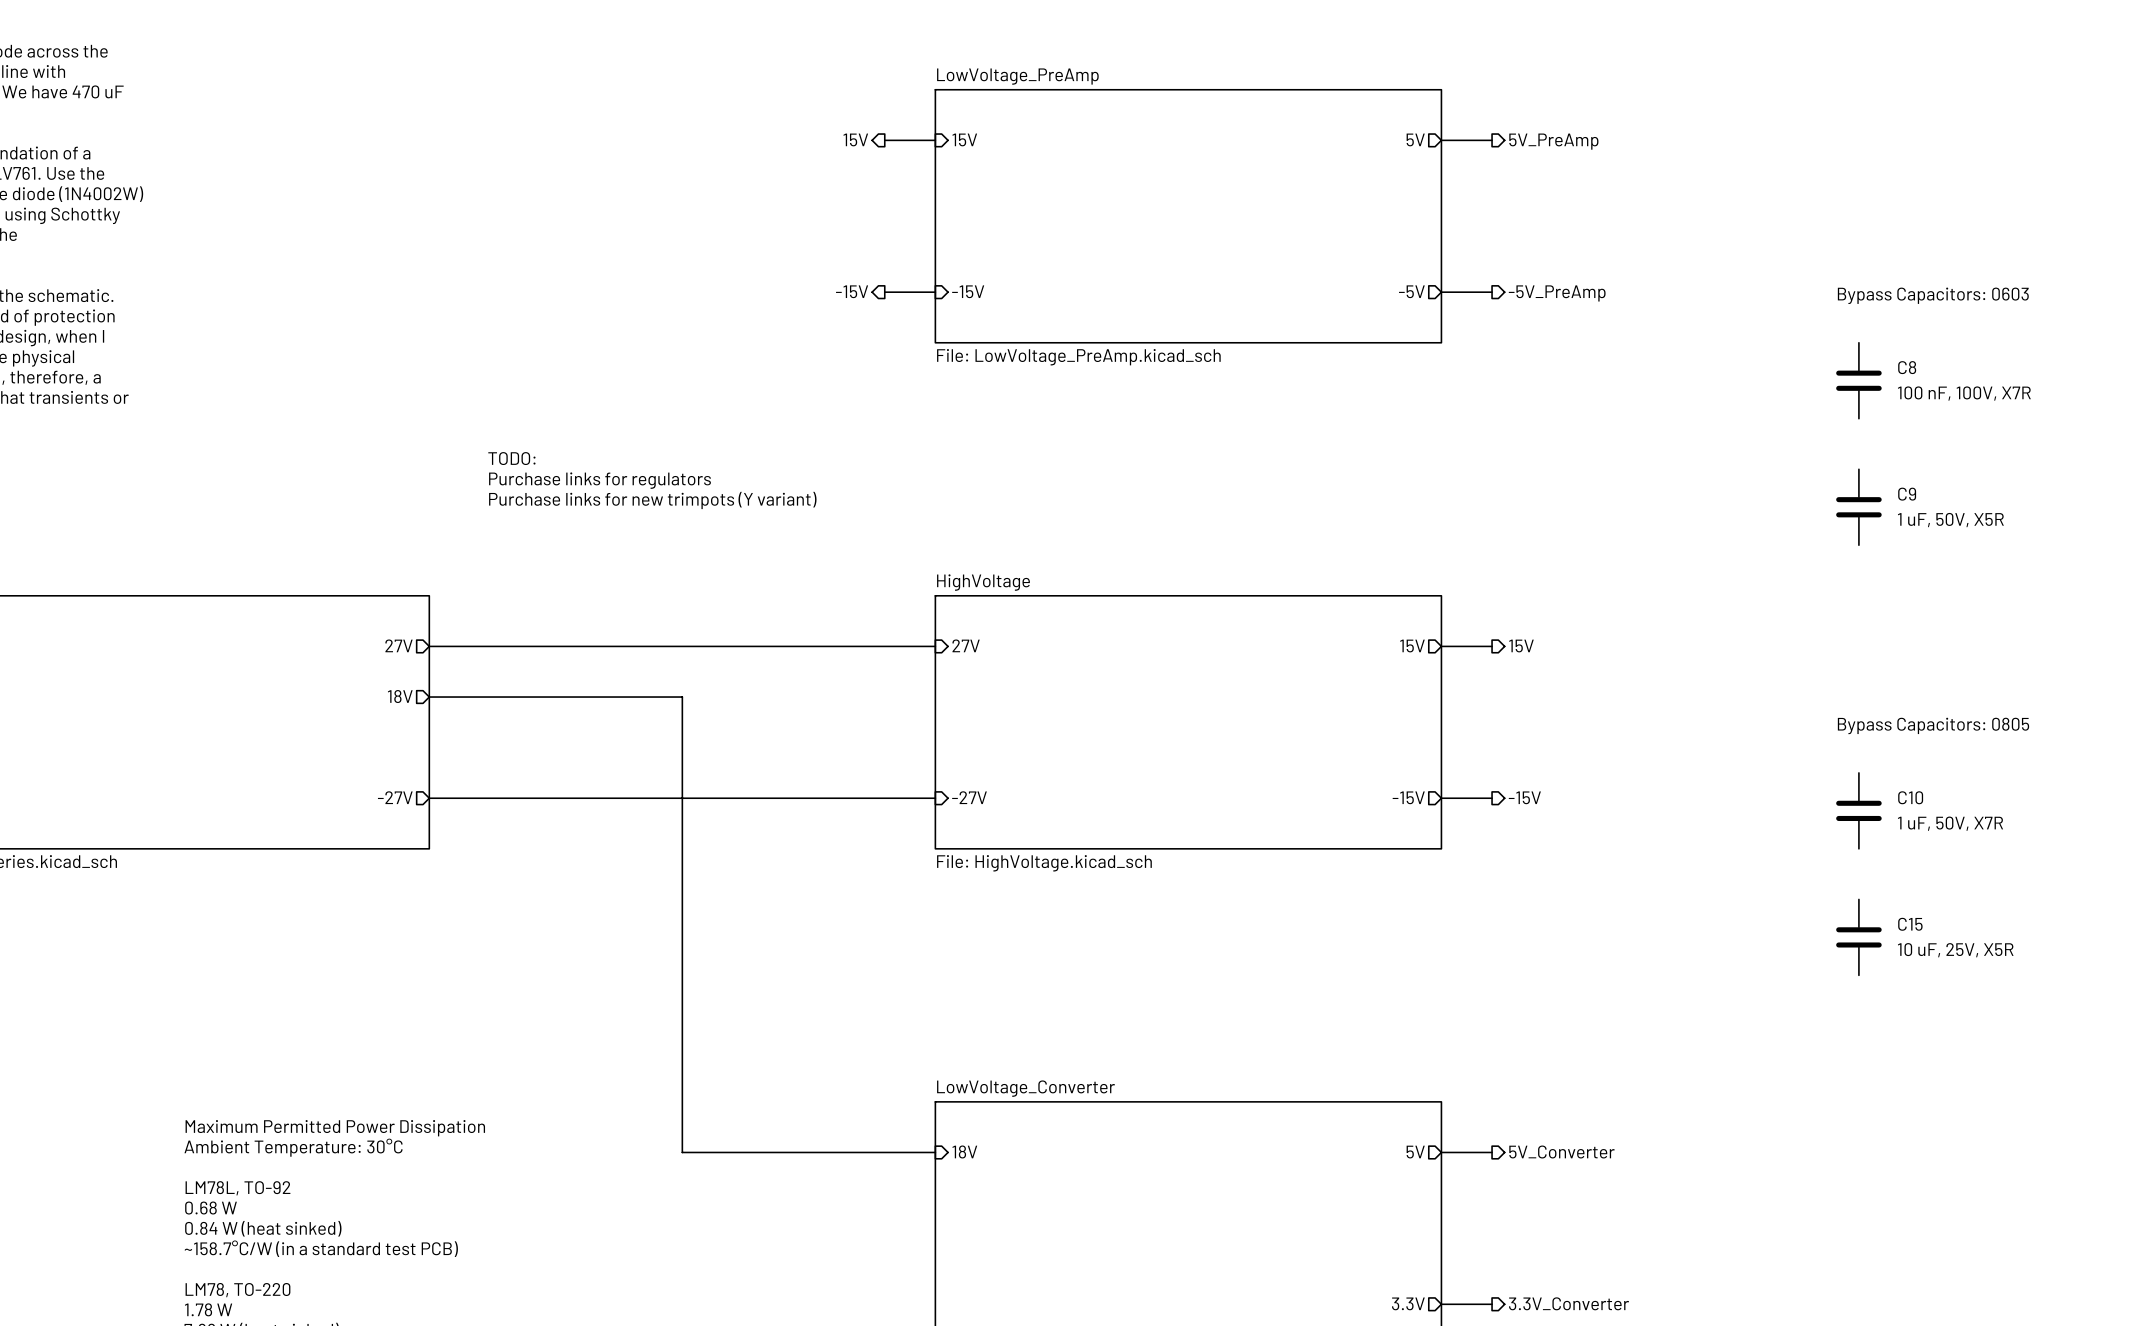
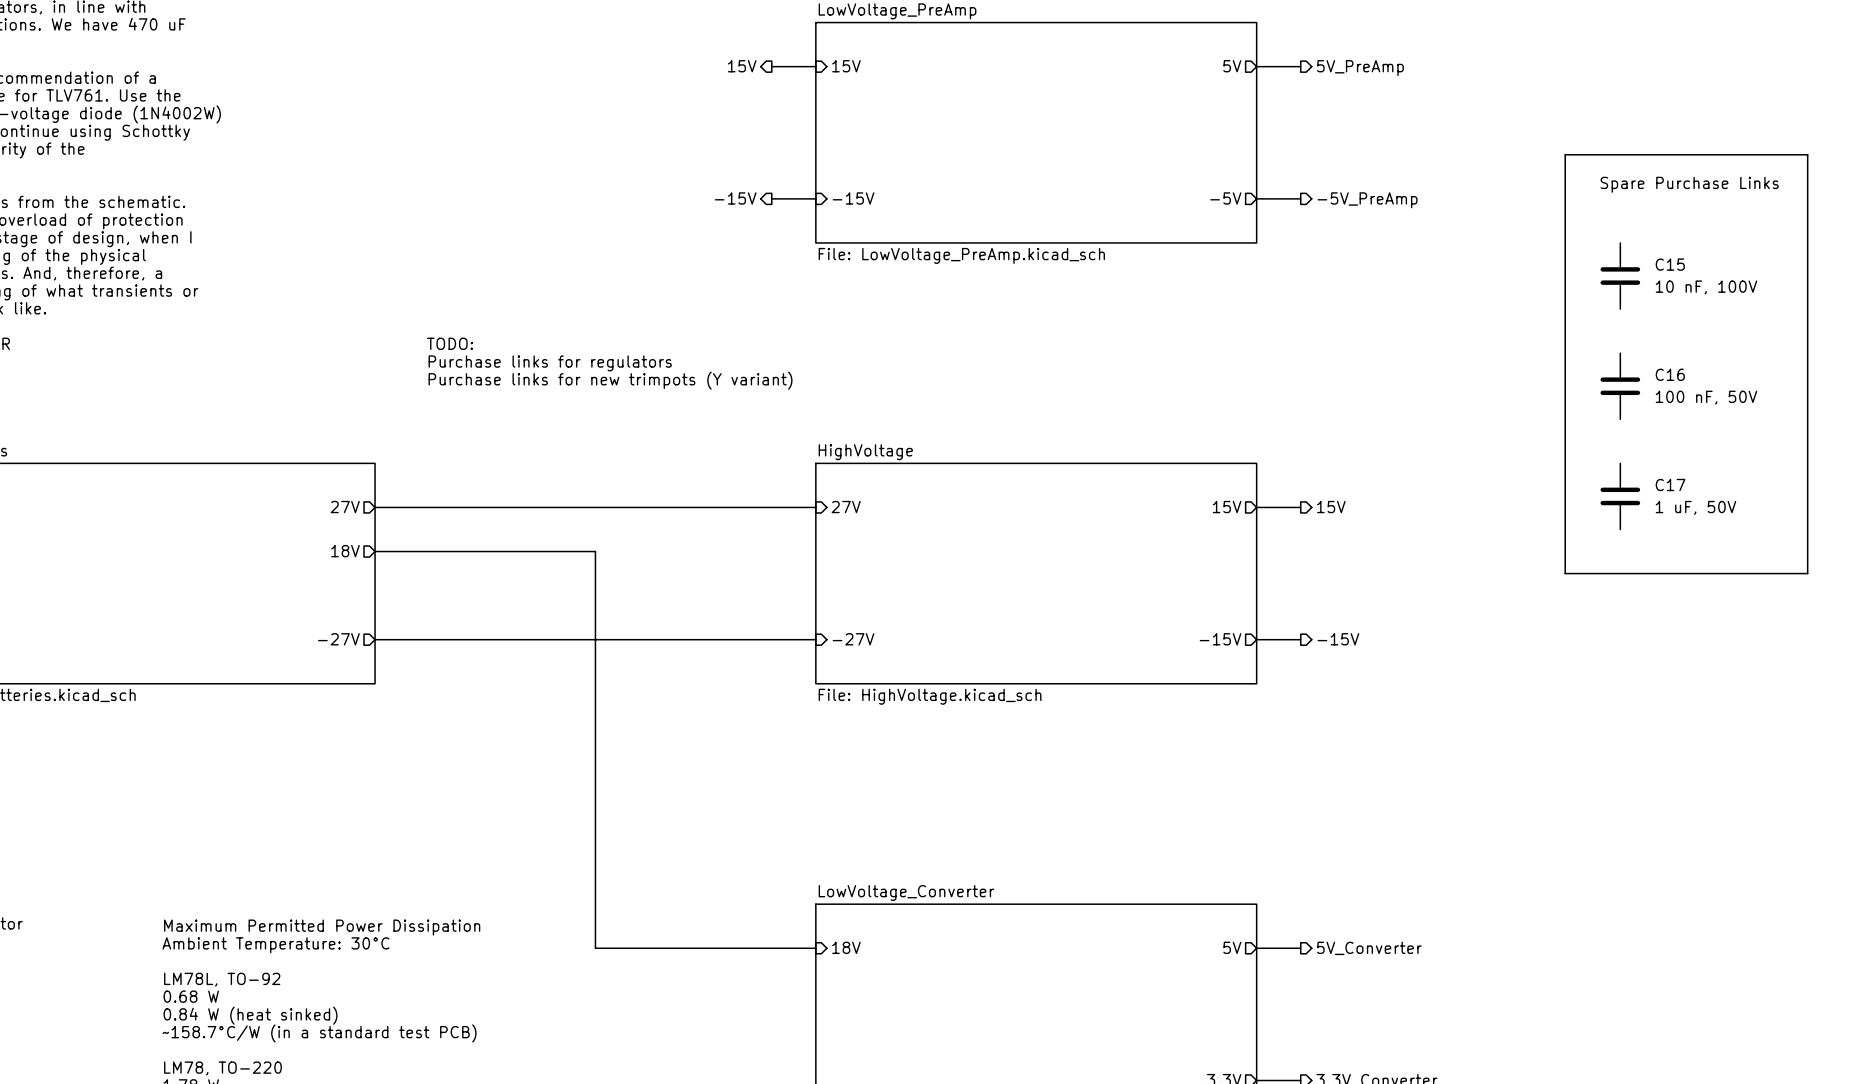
line: none -> (1565, 154) (1807, 154) (1807, 573) (1565, 573) (1565, 154)
text: none -> Spare Purchase Links (1689, 184)
text: Bypass Capacitors: 0603 (1933, 295) -> none
C8 name: C8 (1907, 367) -> C15 (1670, 264)
C8 value: 100 nF, 100V, X7R (1964, 393) -> 10 nF, 100V (1706, 287)
C9 name: C9 (1907, 494) -> C16 (1670, 374)
C9 value: 1 uF, 50V, X5R (1950, 520) -> 100 nF, 50V (1706, 397)
C17: none -> 1 uF, 50V (1620, 496)
text: Bypass Capacitors: 0805 (1933, 725) -> none
C10: 1 uF, 50V, X7R (1858, 810) -> none
C15: 10 uF, 25V, X5R (1858, 937) -> none

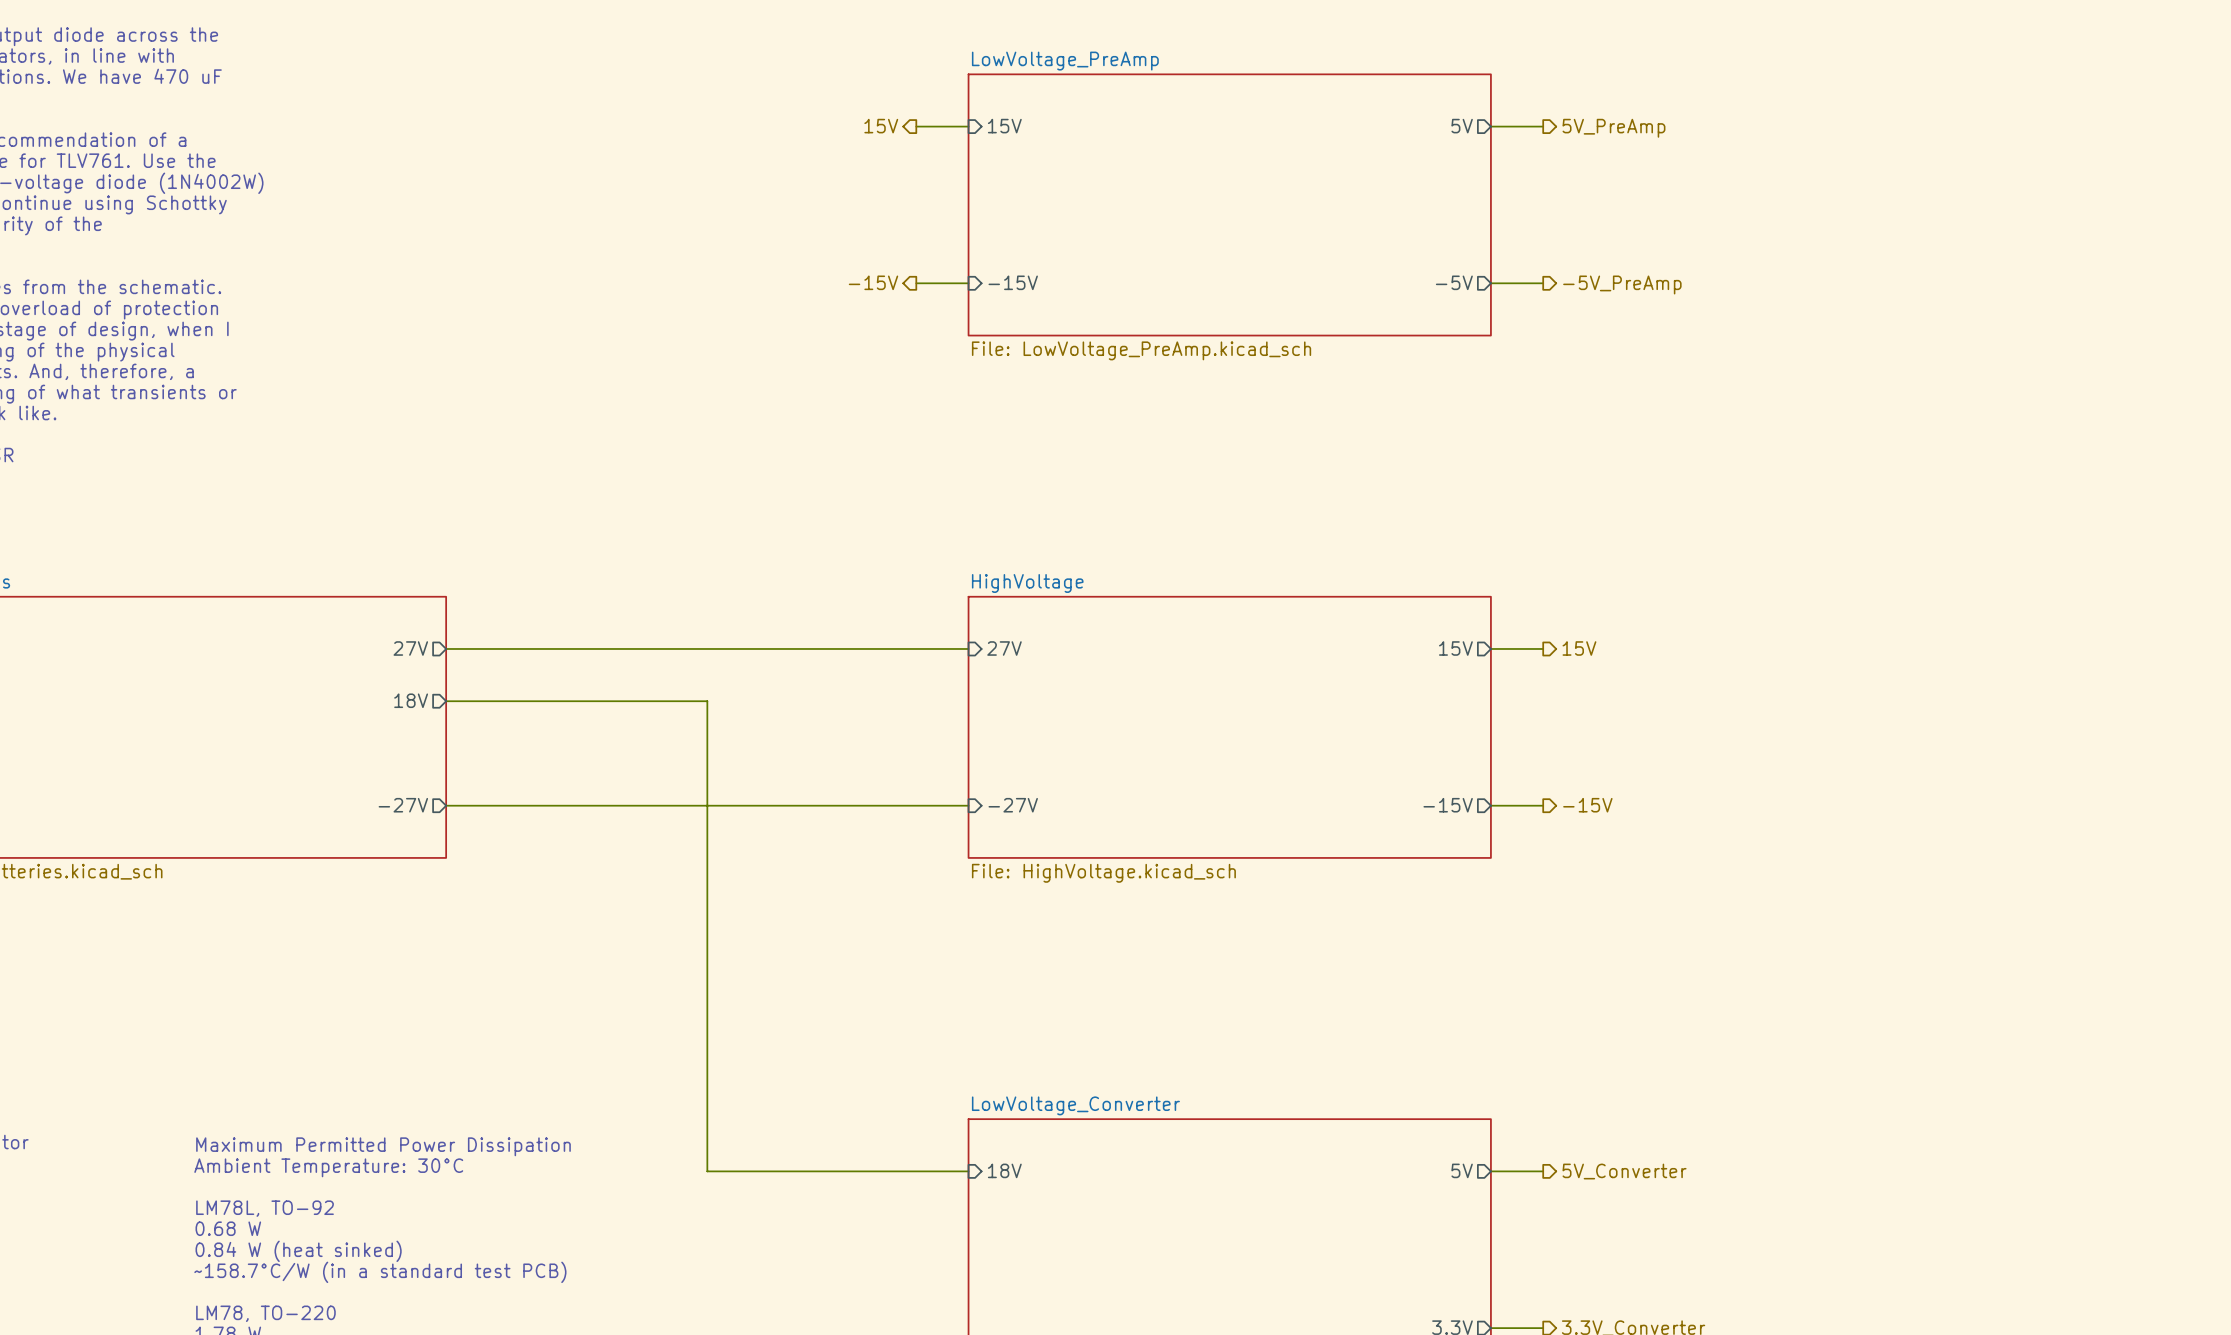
line: (1565, 154) (1807, 154) (1807, 573) (1565, 573) (1565, 154) -> none
text: Spare Purchase Links (1689, 184) -> none
C15: 10 nF, 100V (1620, 276) -> none
text: TODO: (449, 343) -> none
text: Purchase links for regulators (550, 363) -> none
text: Purchase links for new trimpots (Y variant) (610, 380) -> none
C16: 100 nF, 50V (1620, 386) -> none
C17: 1 uF, 50V (1620, 496) -> none

